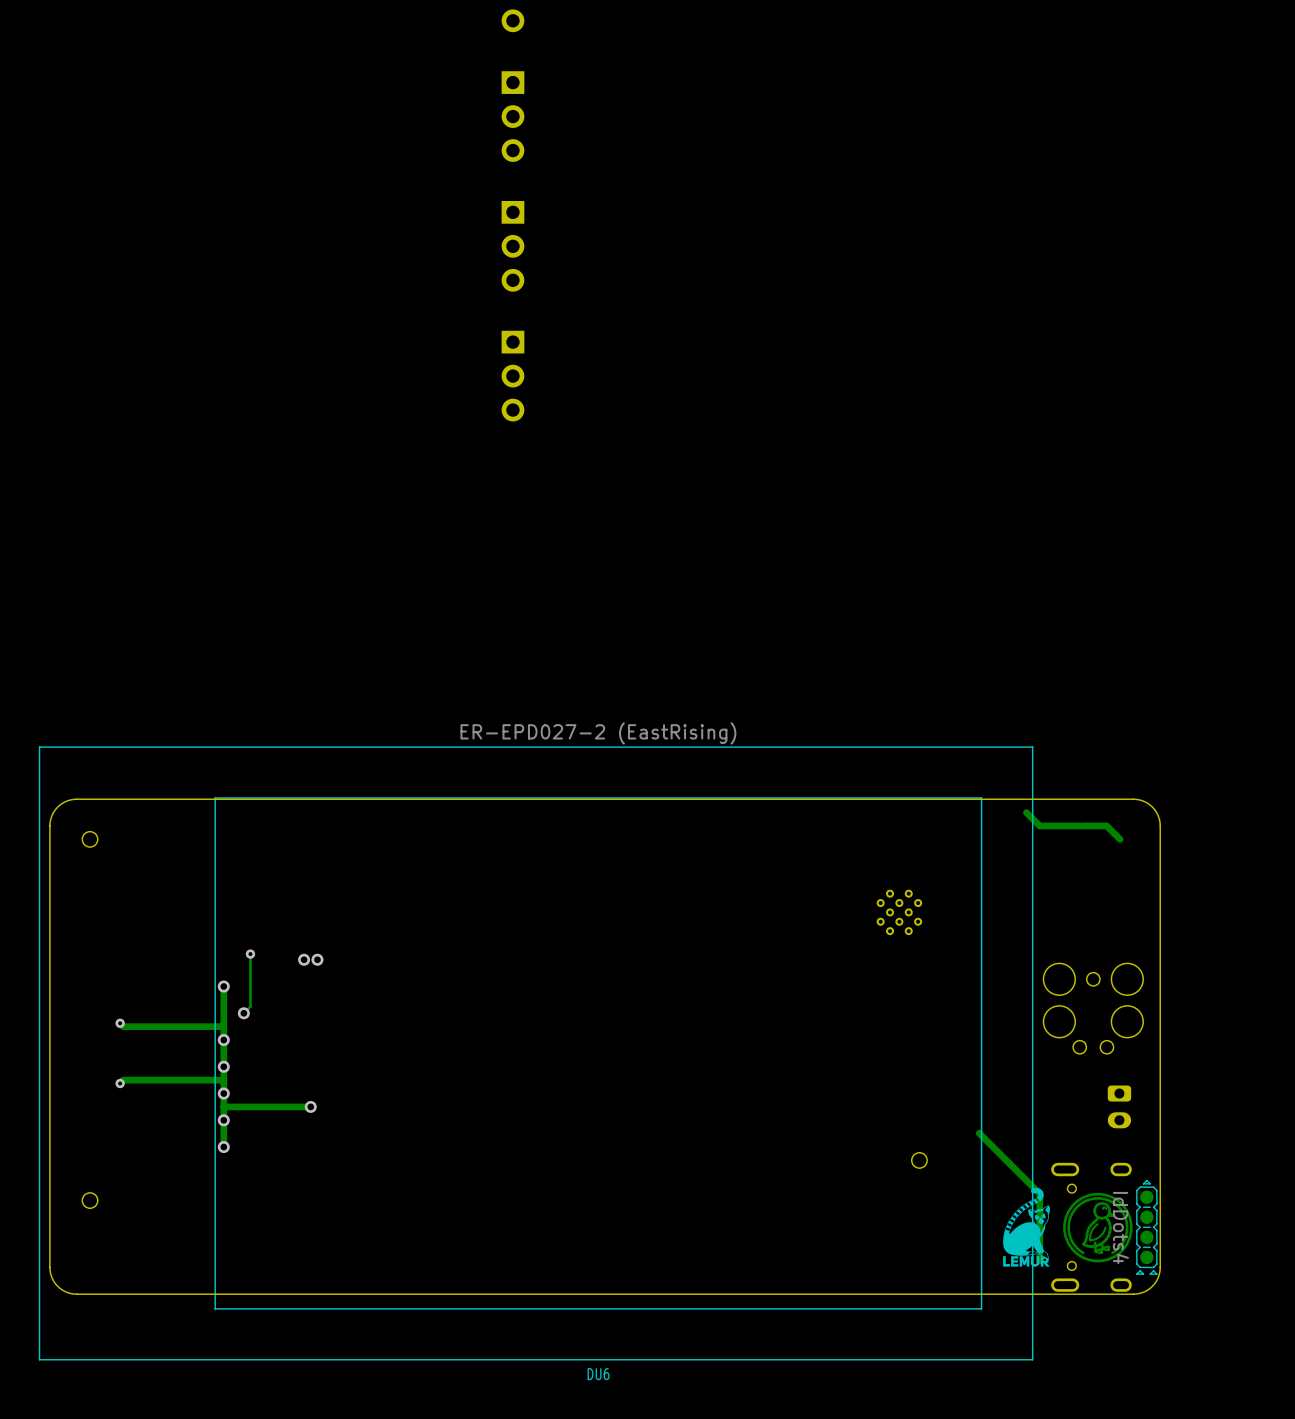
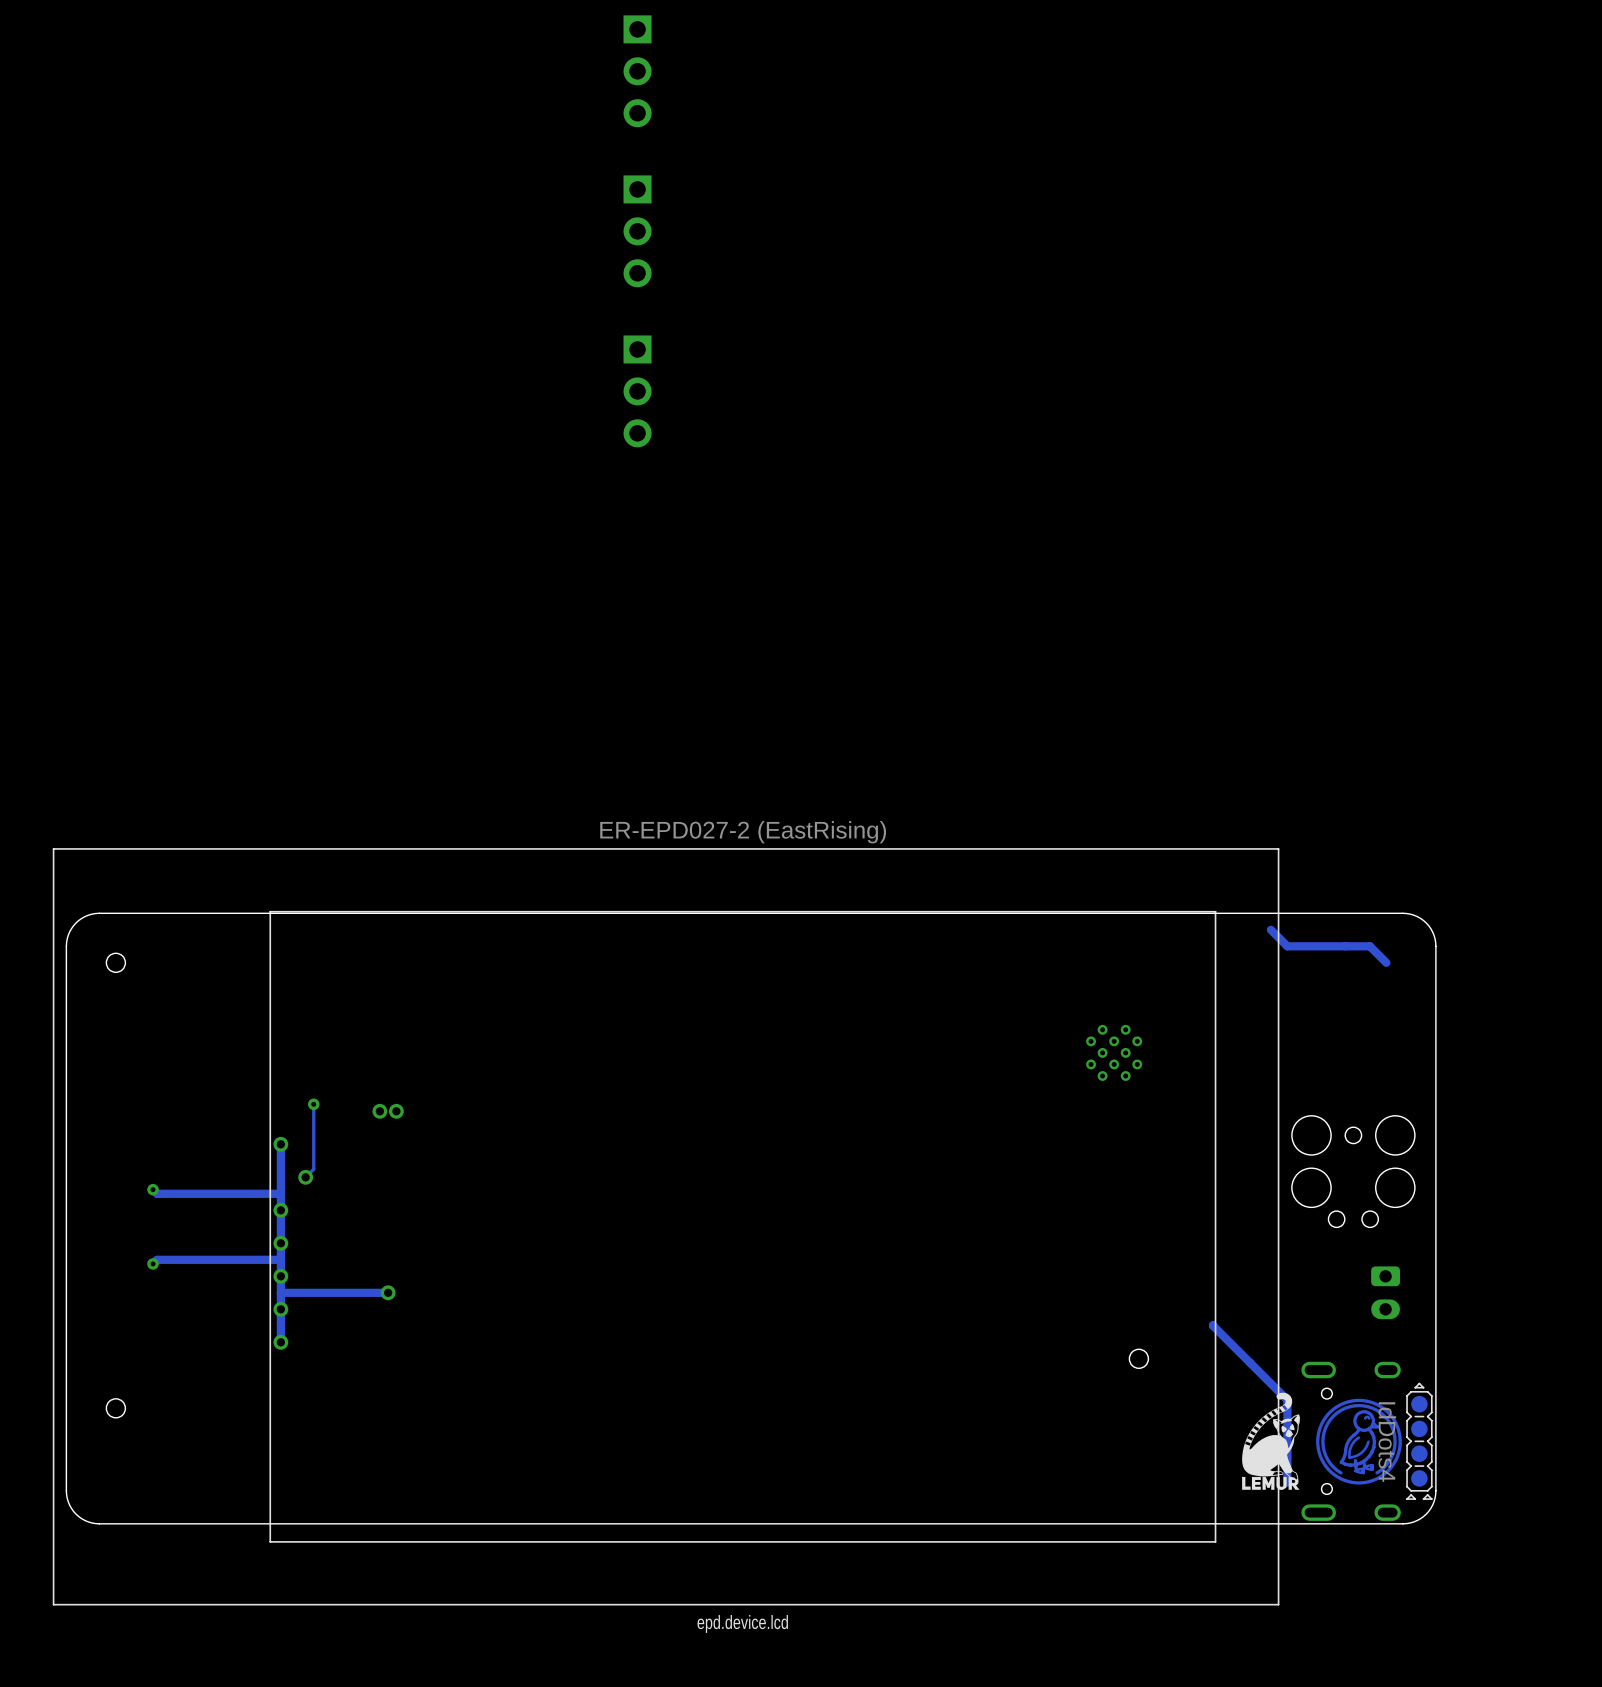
DU6 name: DU6 (598, 1374) -> epd.device.lcd (742, 1623)

